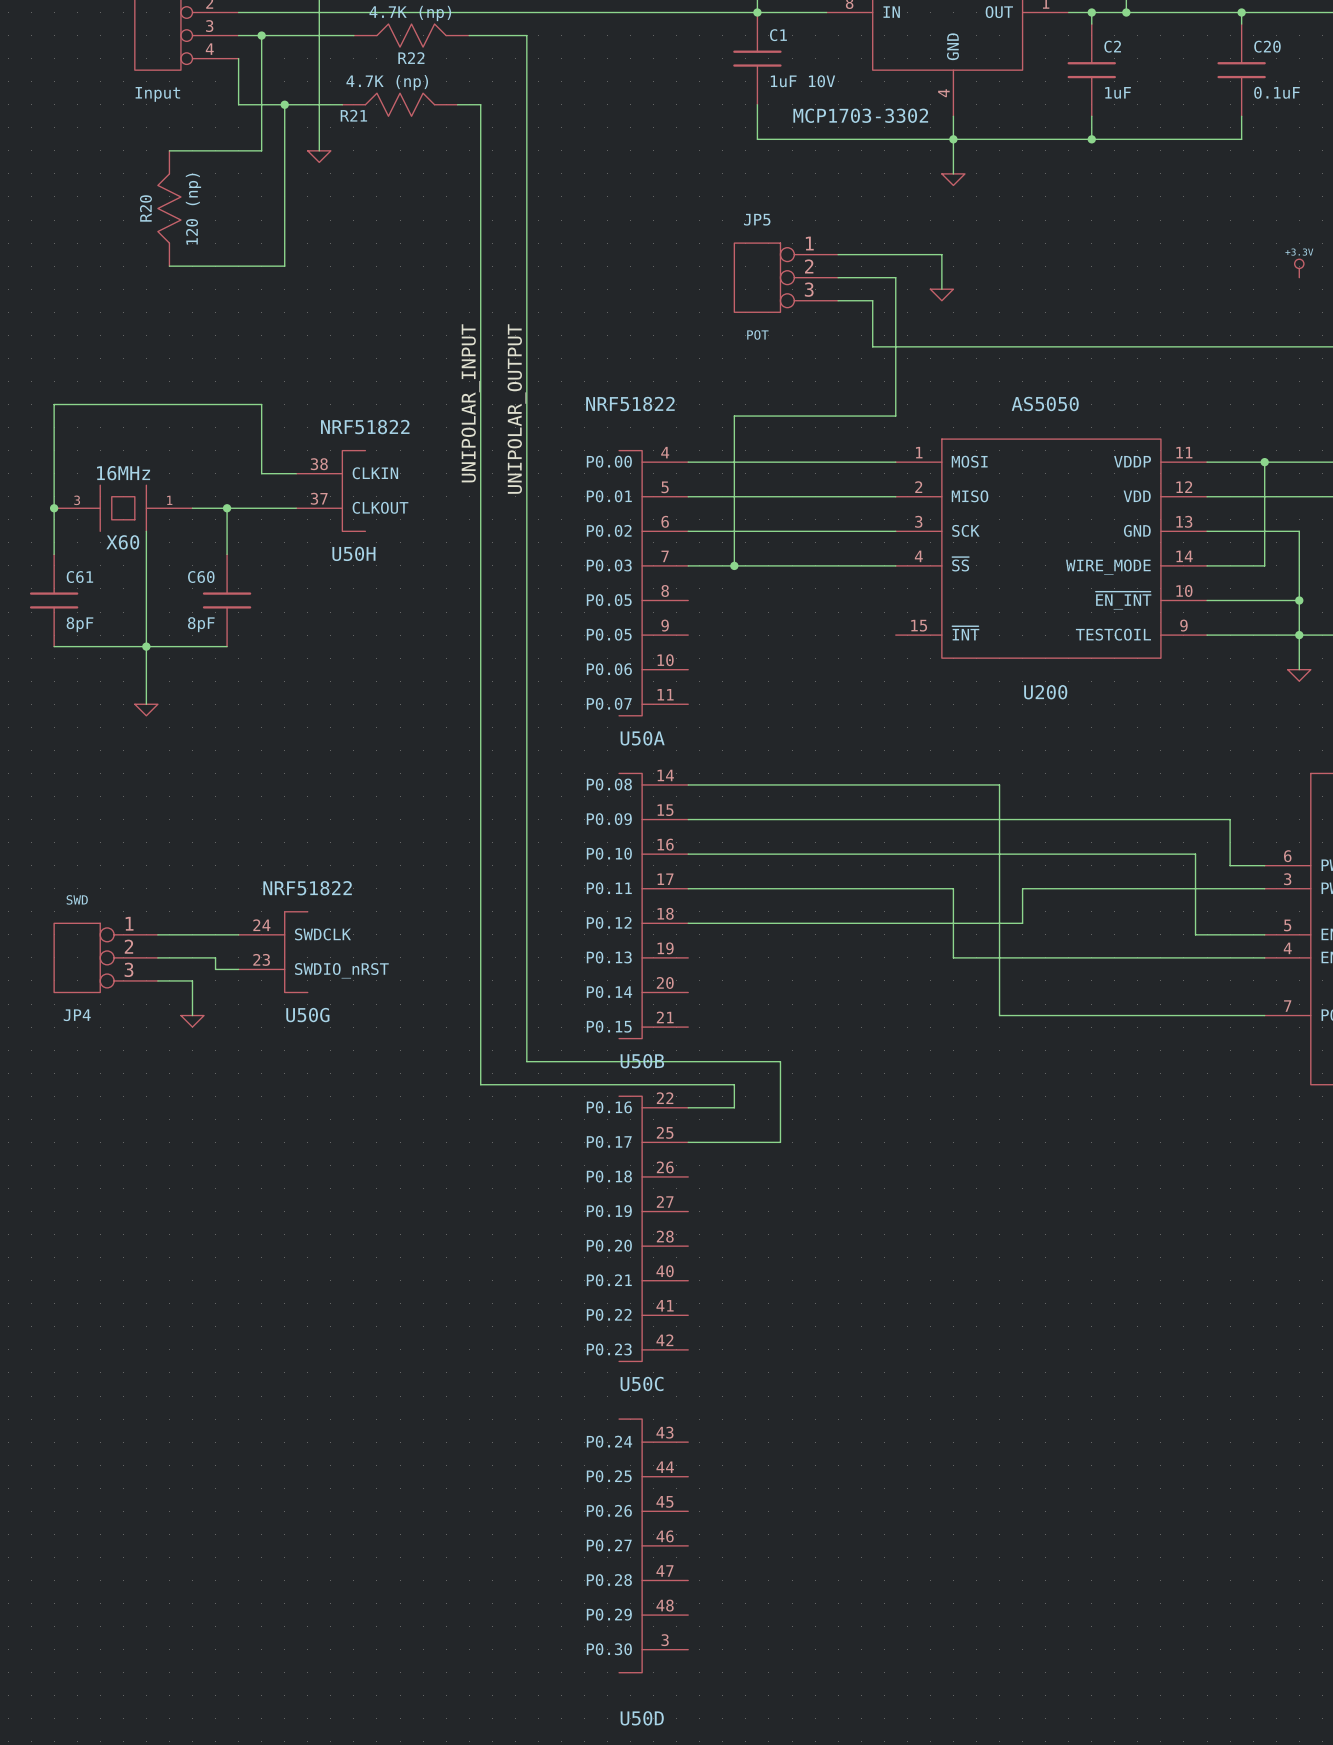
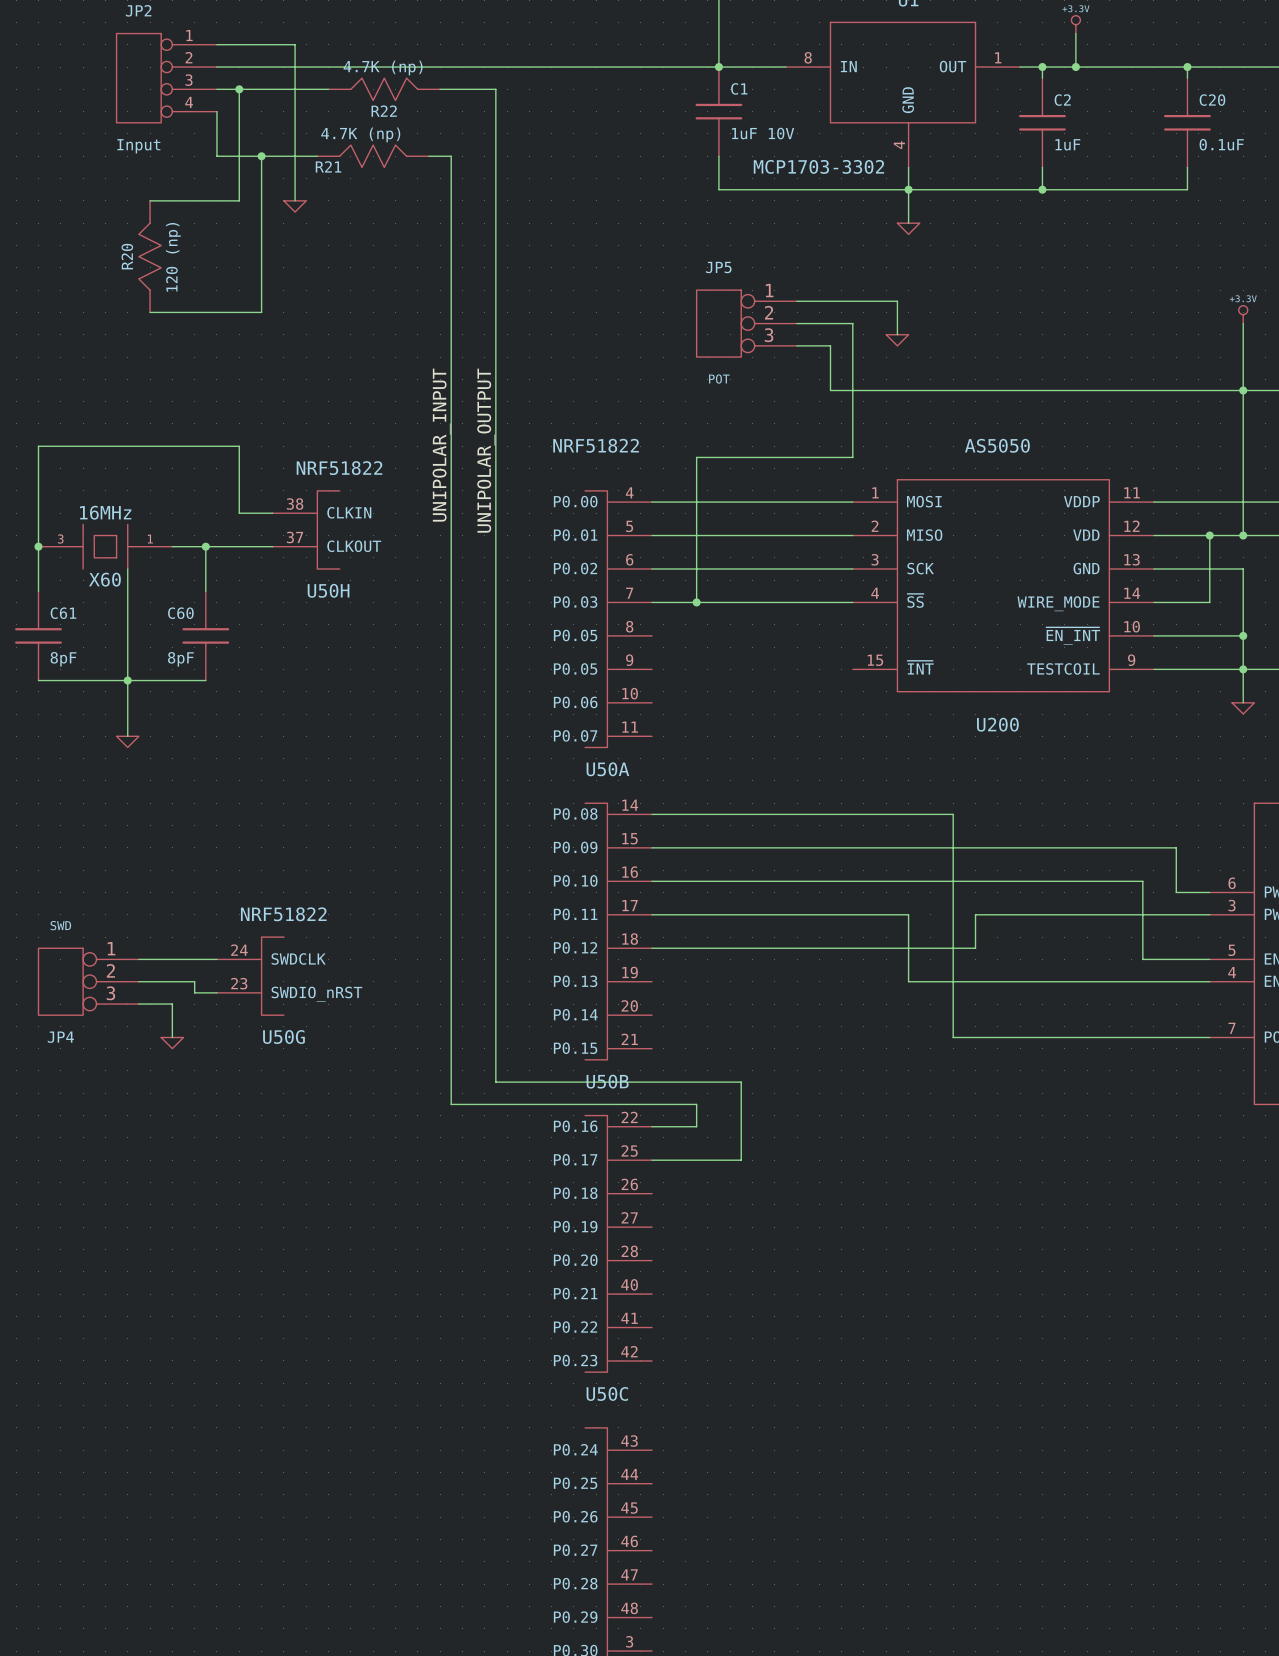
wire: none -> (1243, 323) (1243, 535)
junction: none -> (1243, 390)
wire: (1264, 462) (1264, 496) -> none
junction: (1264, 462) -> none
junction: none -> (1209, 535)
junction: none -> (1243, 535)

